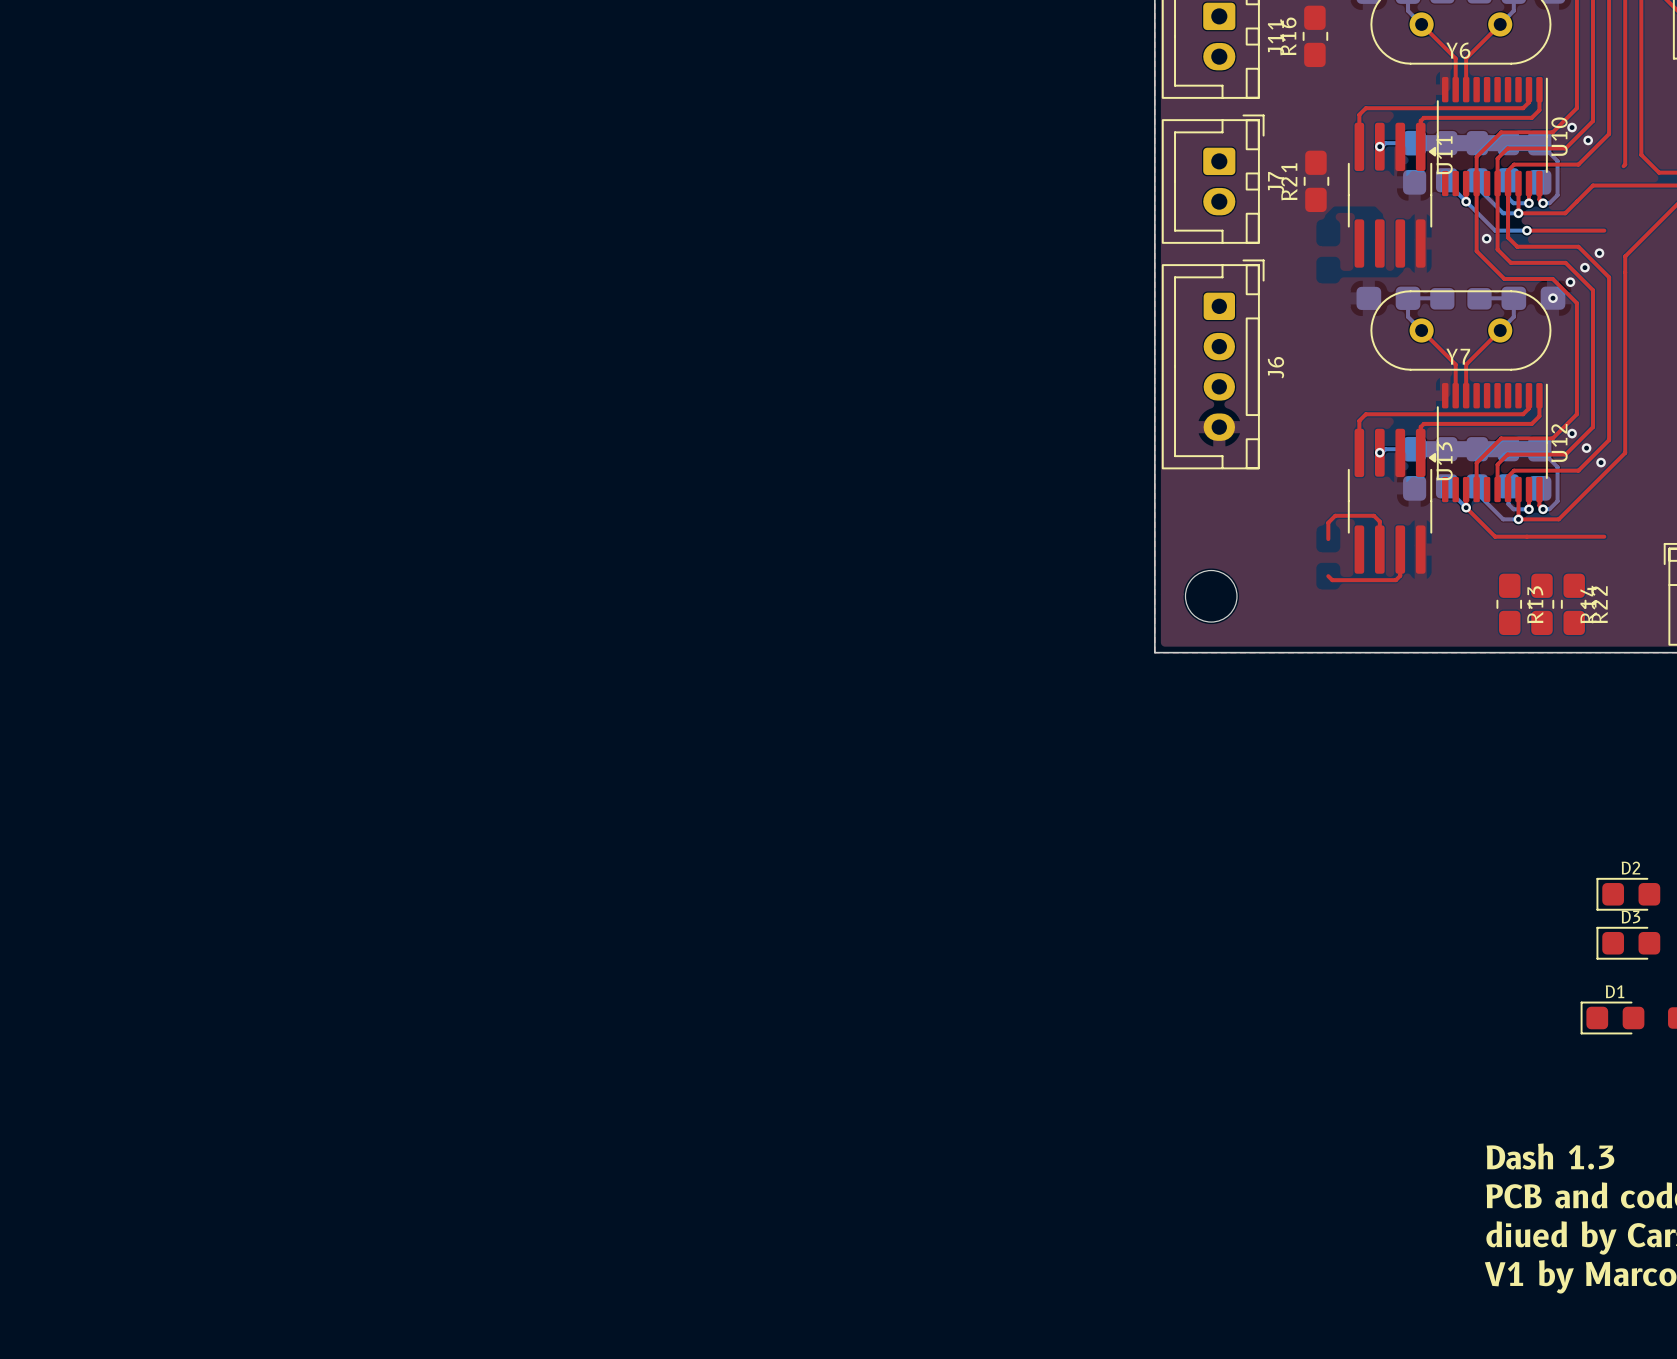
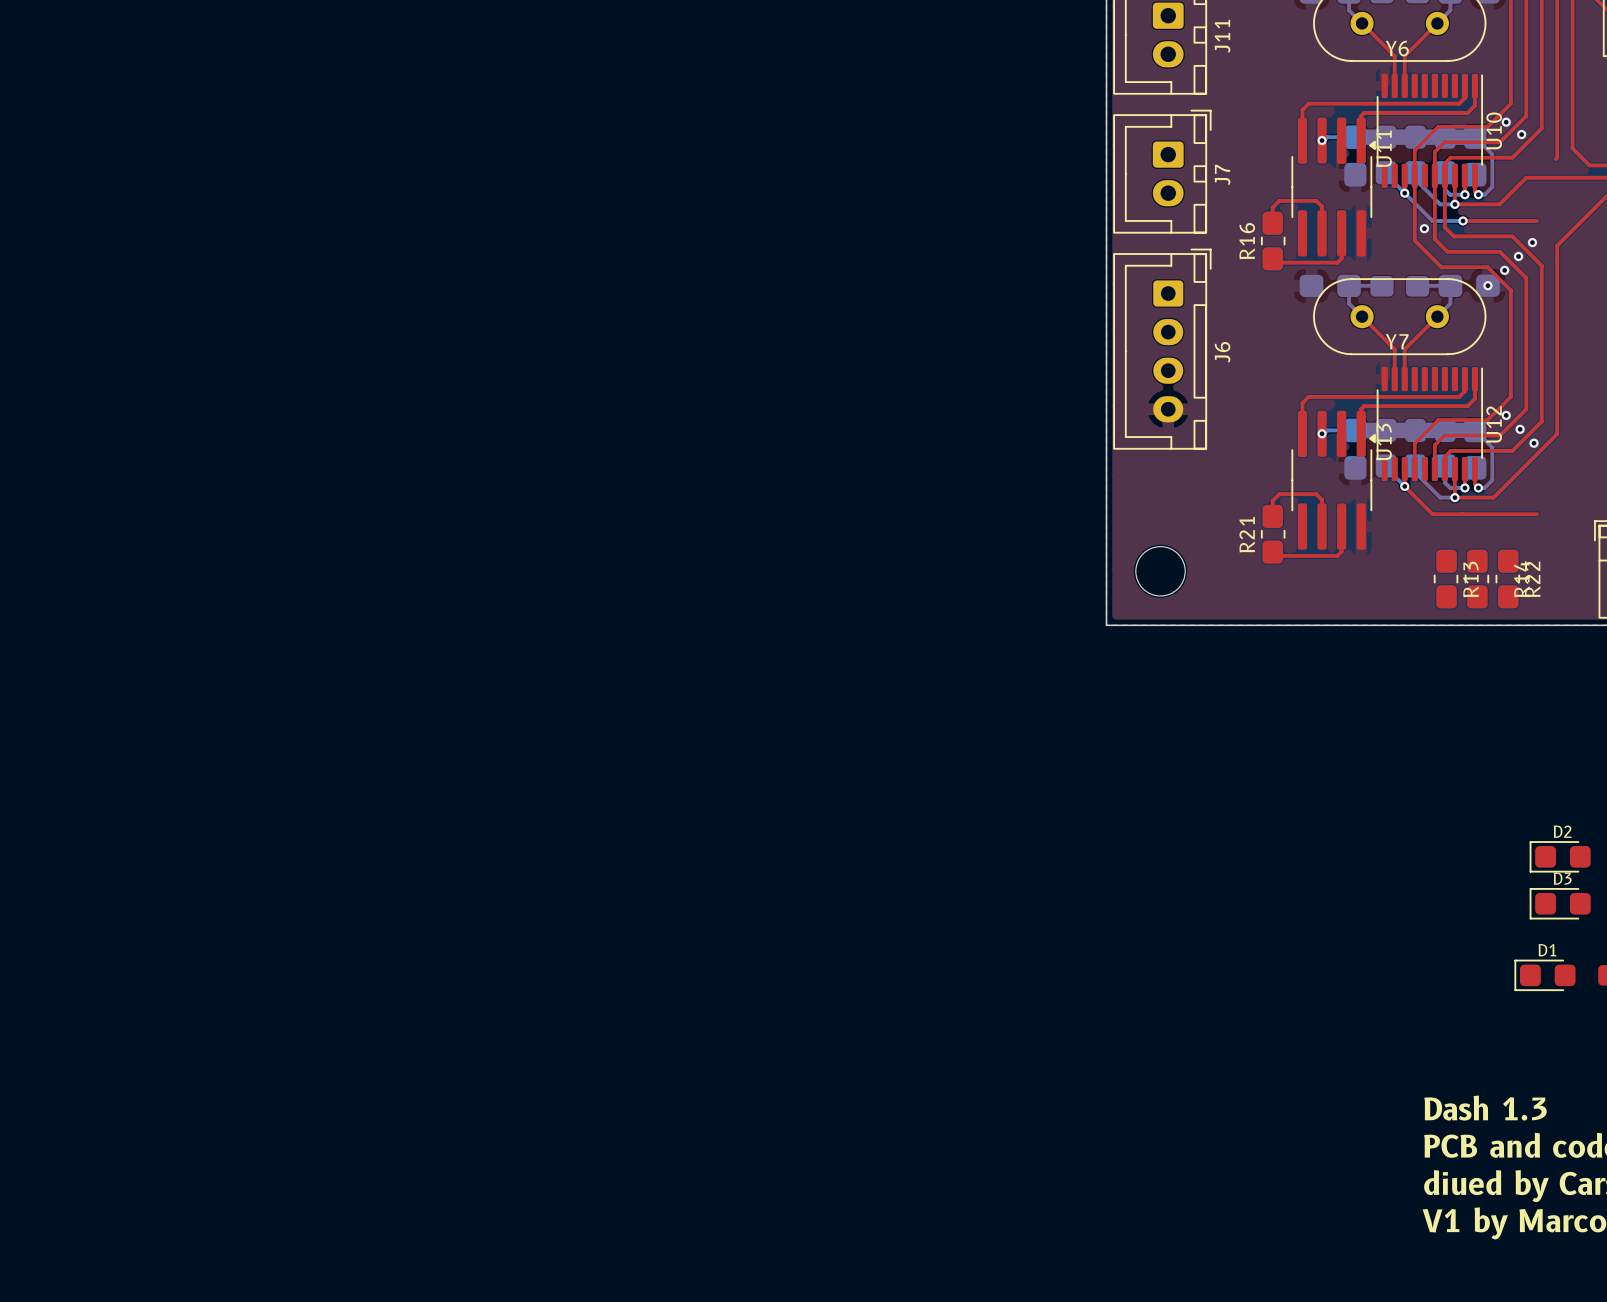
R16 position: (1315, 36) -> (1273, 241)
R21 position: (1316, 181) -> (1273, 534)
top track: none -> (1272, 223) (1272, 207) (1279, 200) (1316, 200) (1322, 206) (1322, 233)
top track: none -> (1341, 233) (1341, 258) (1337, 262) (1276, 262) (1272, 258)

